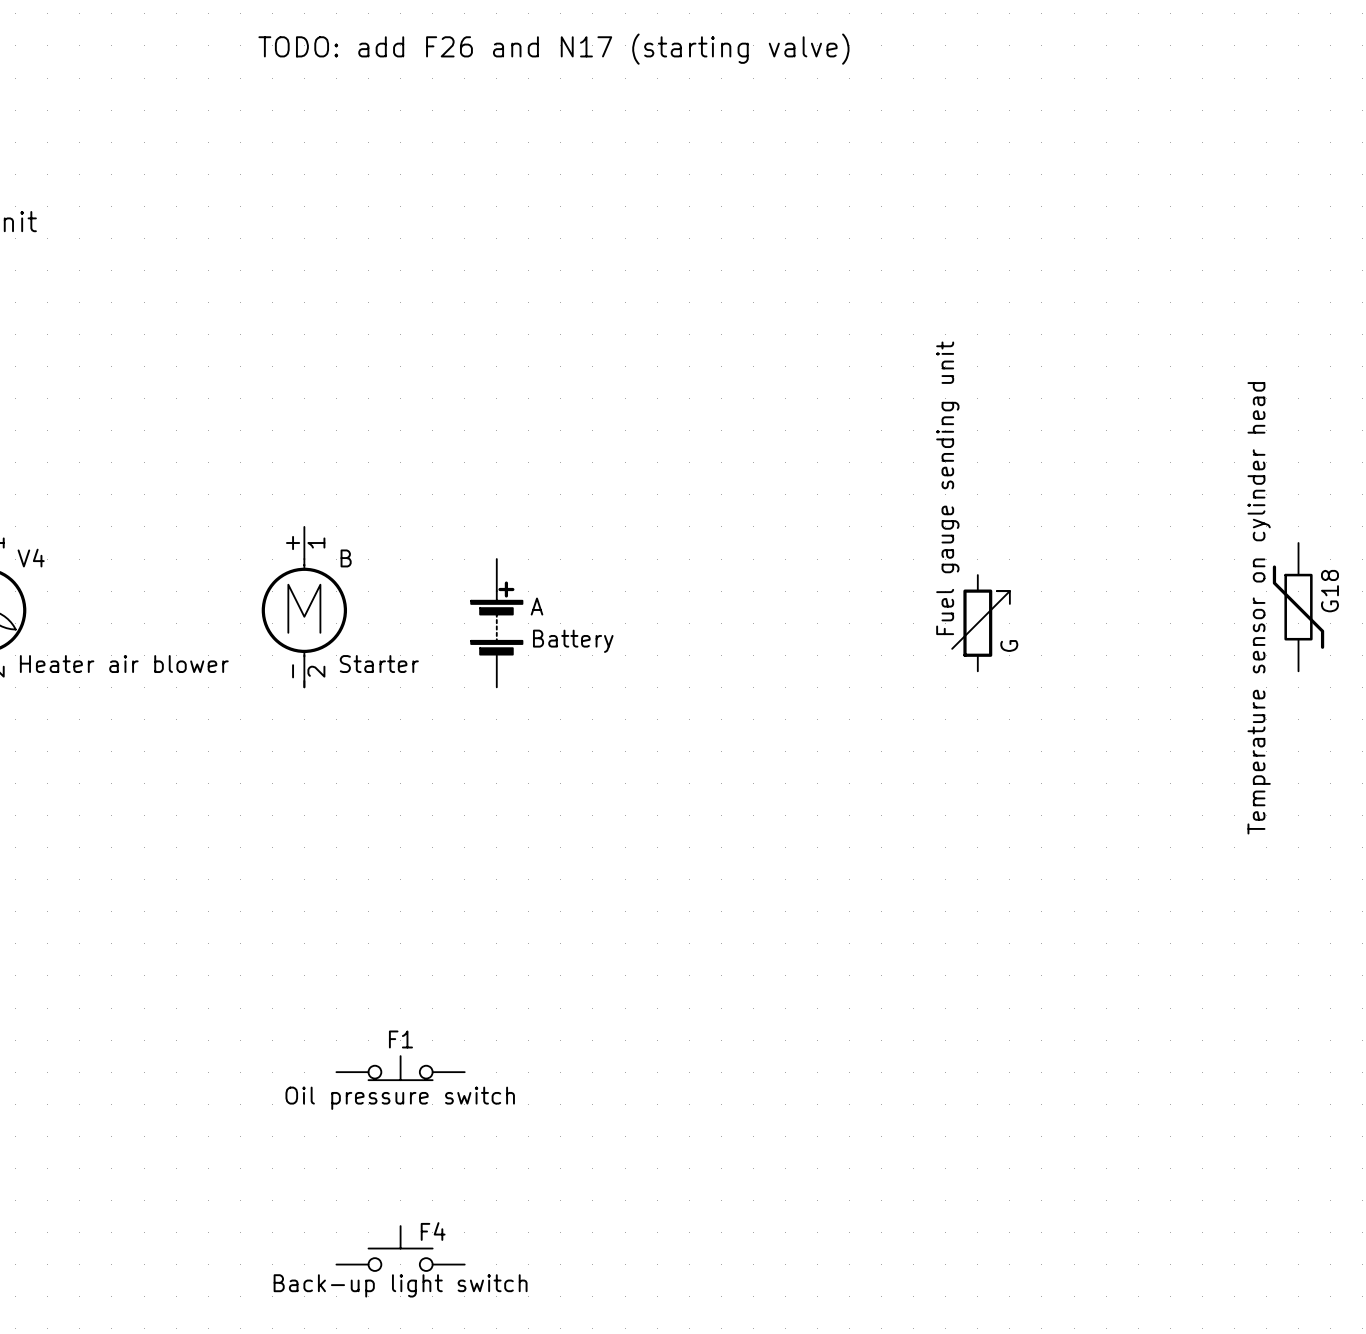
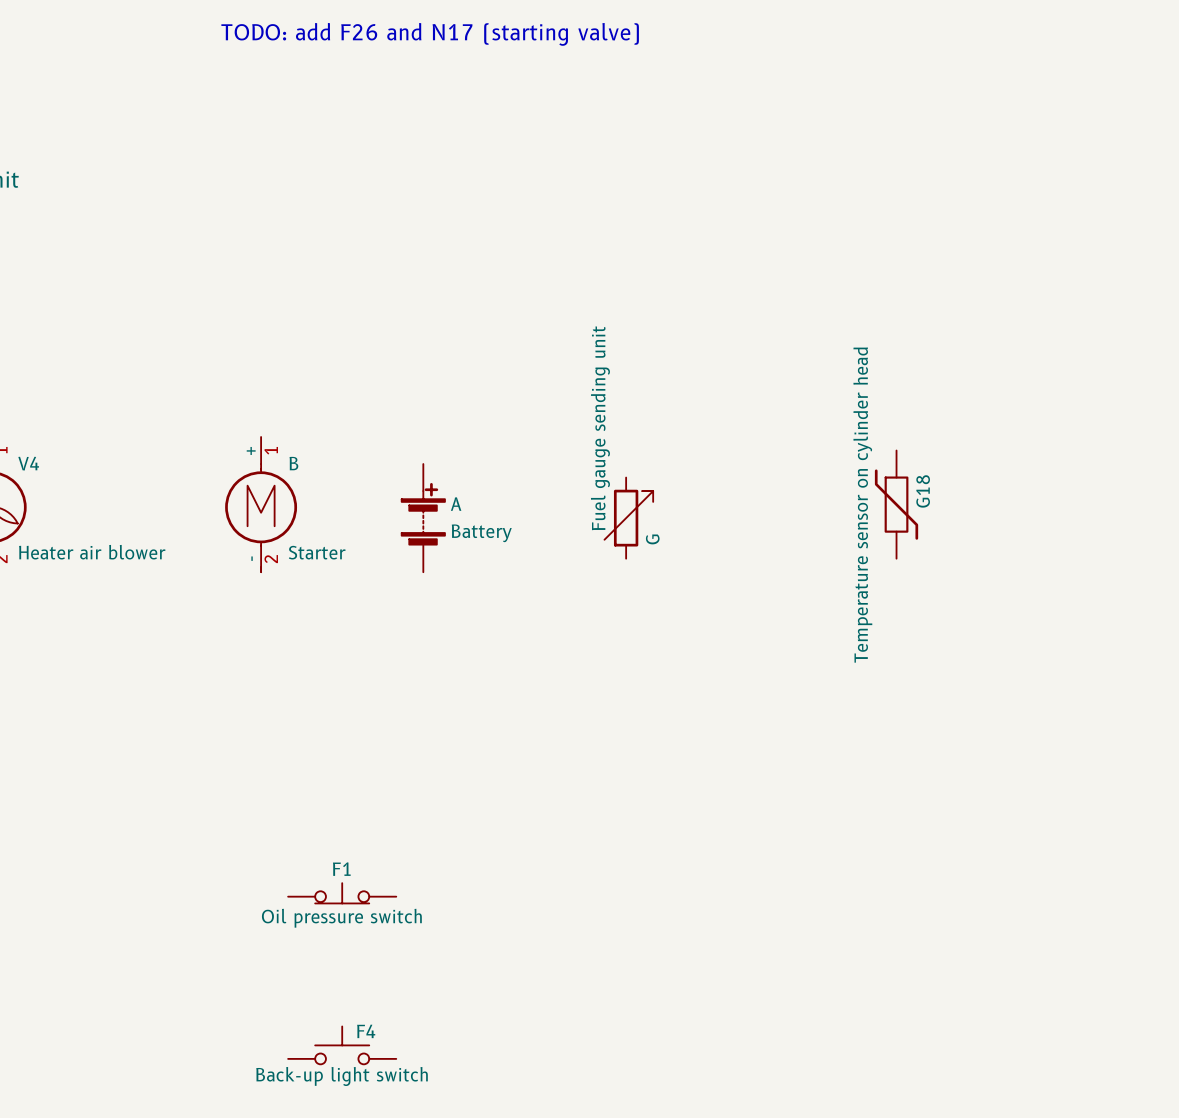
G18 position: (1298, 607) -> (896, 504)
G position: (981, 623) -> (628, 518)

